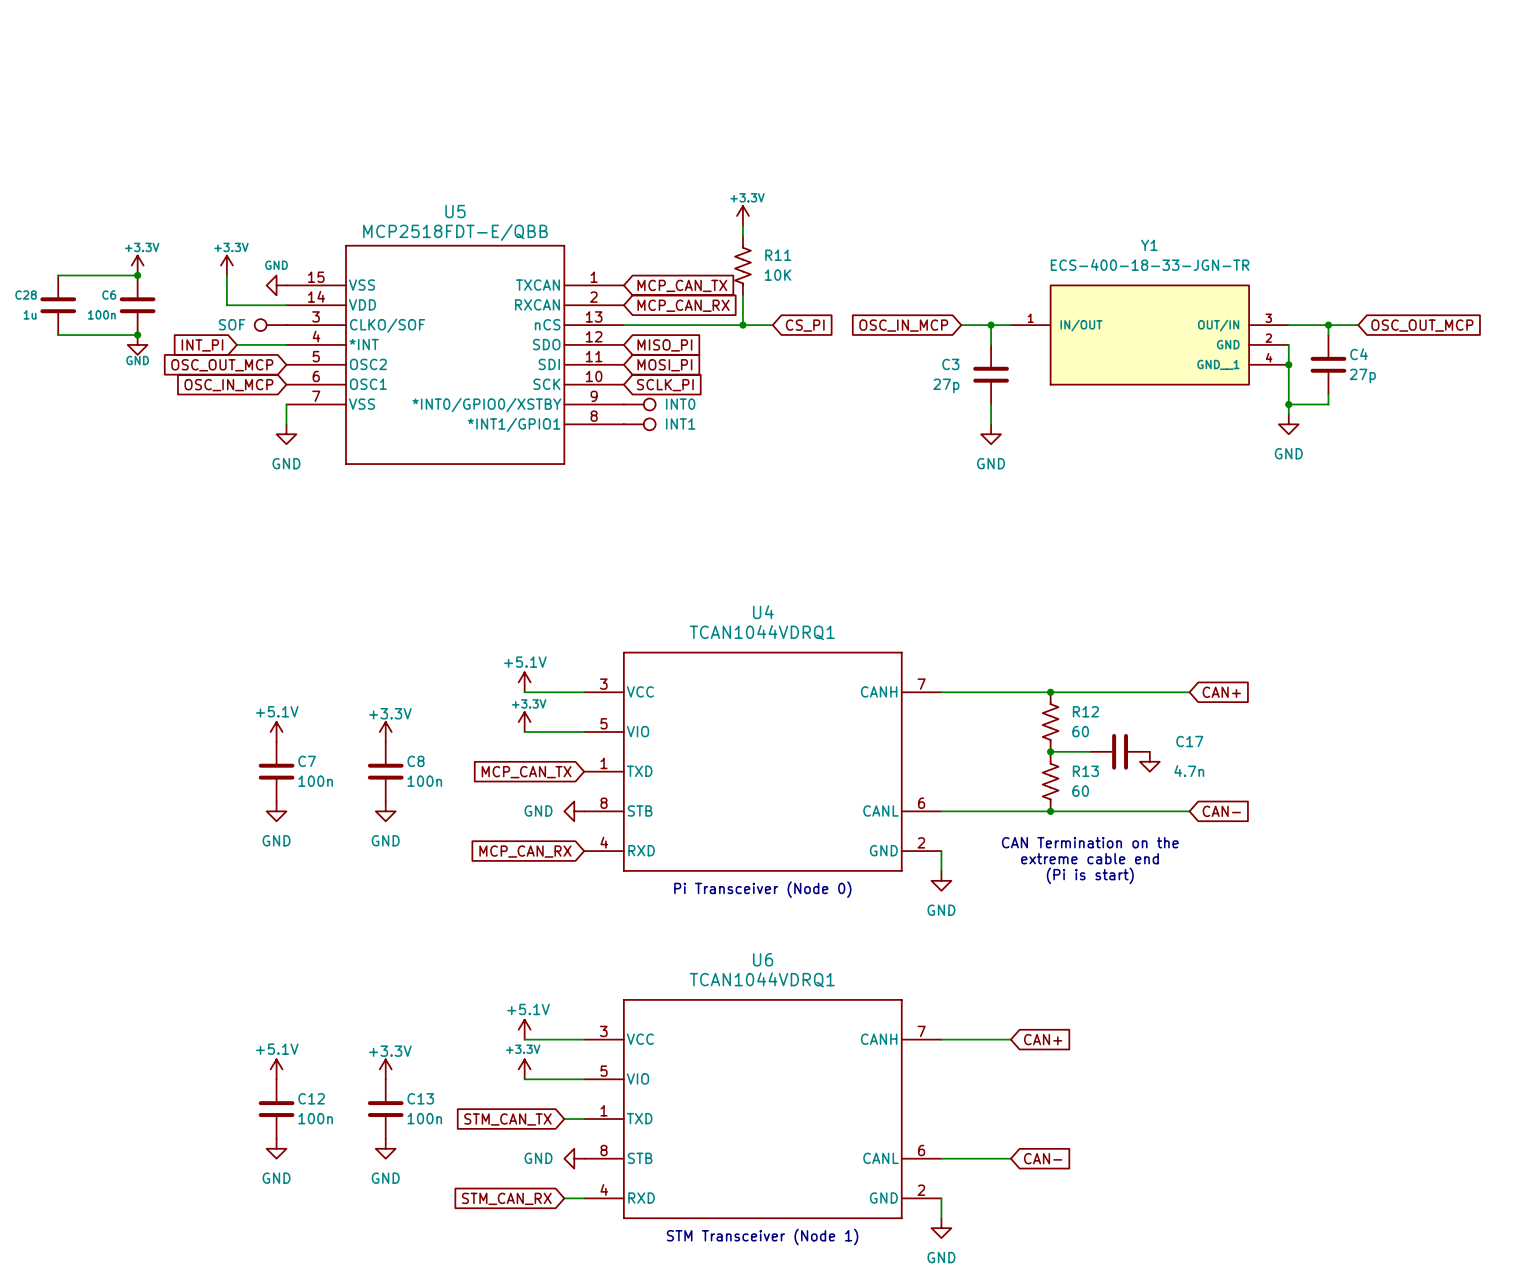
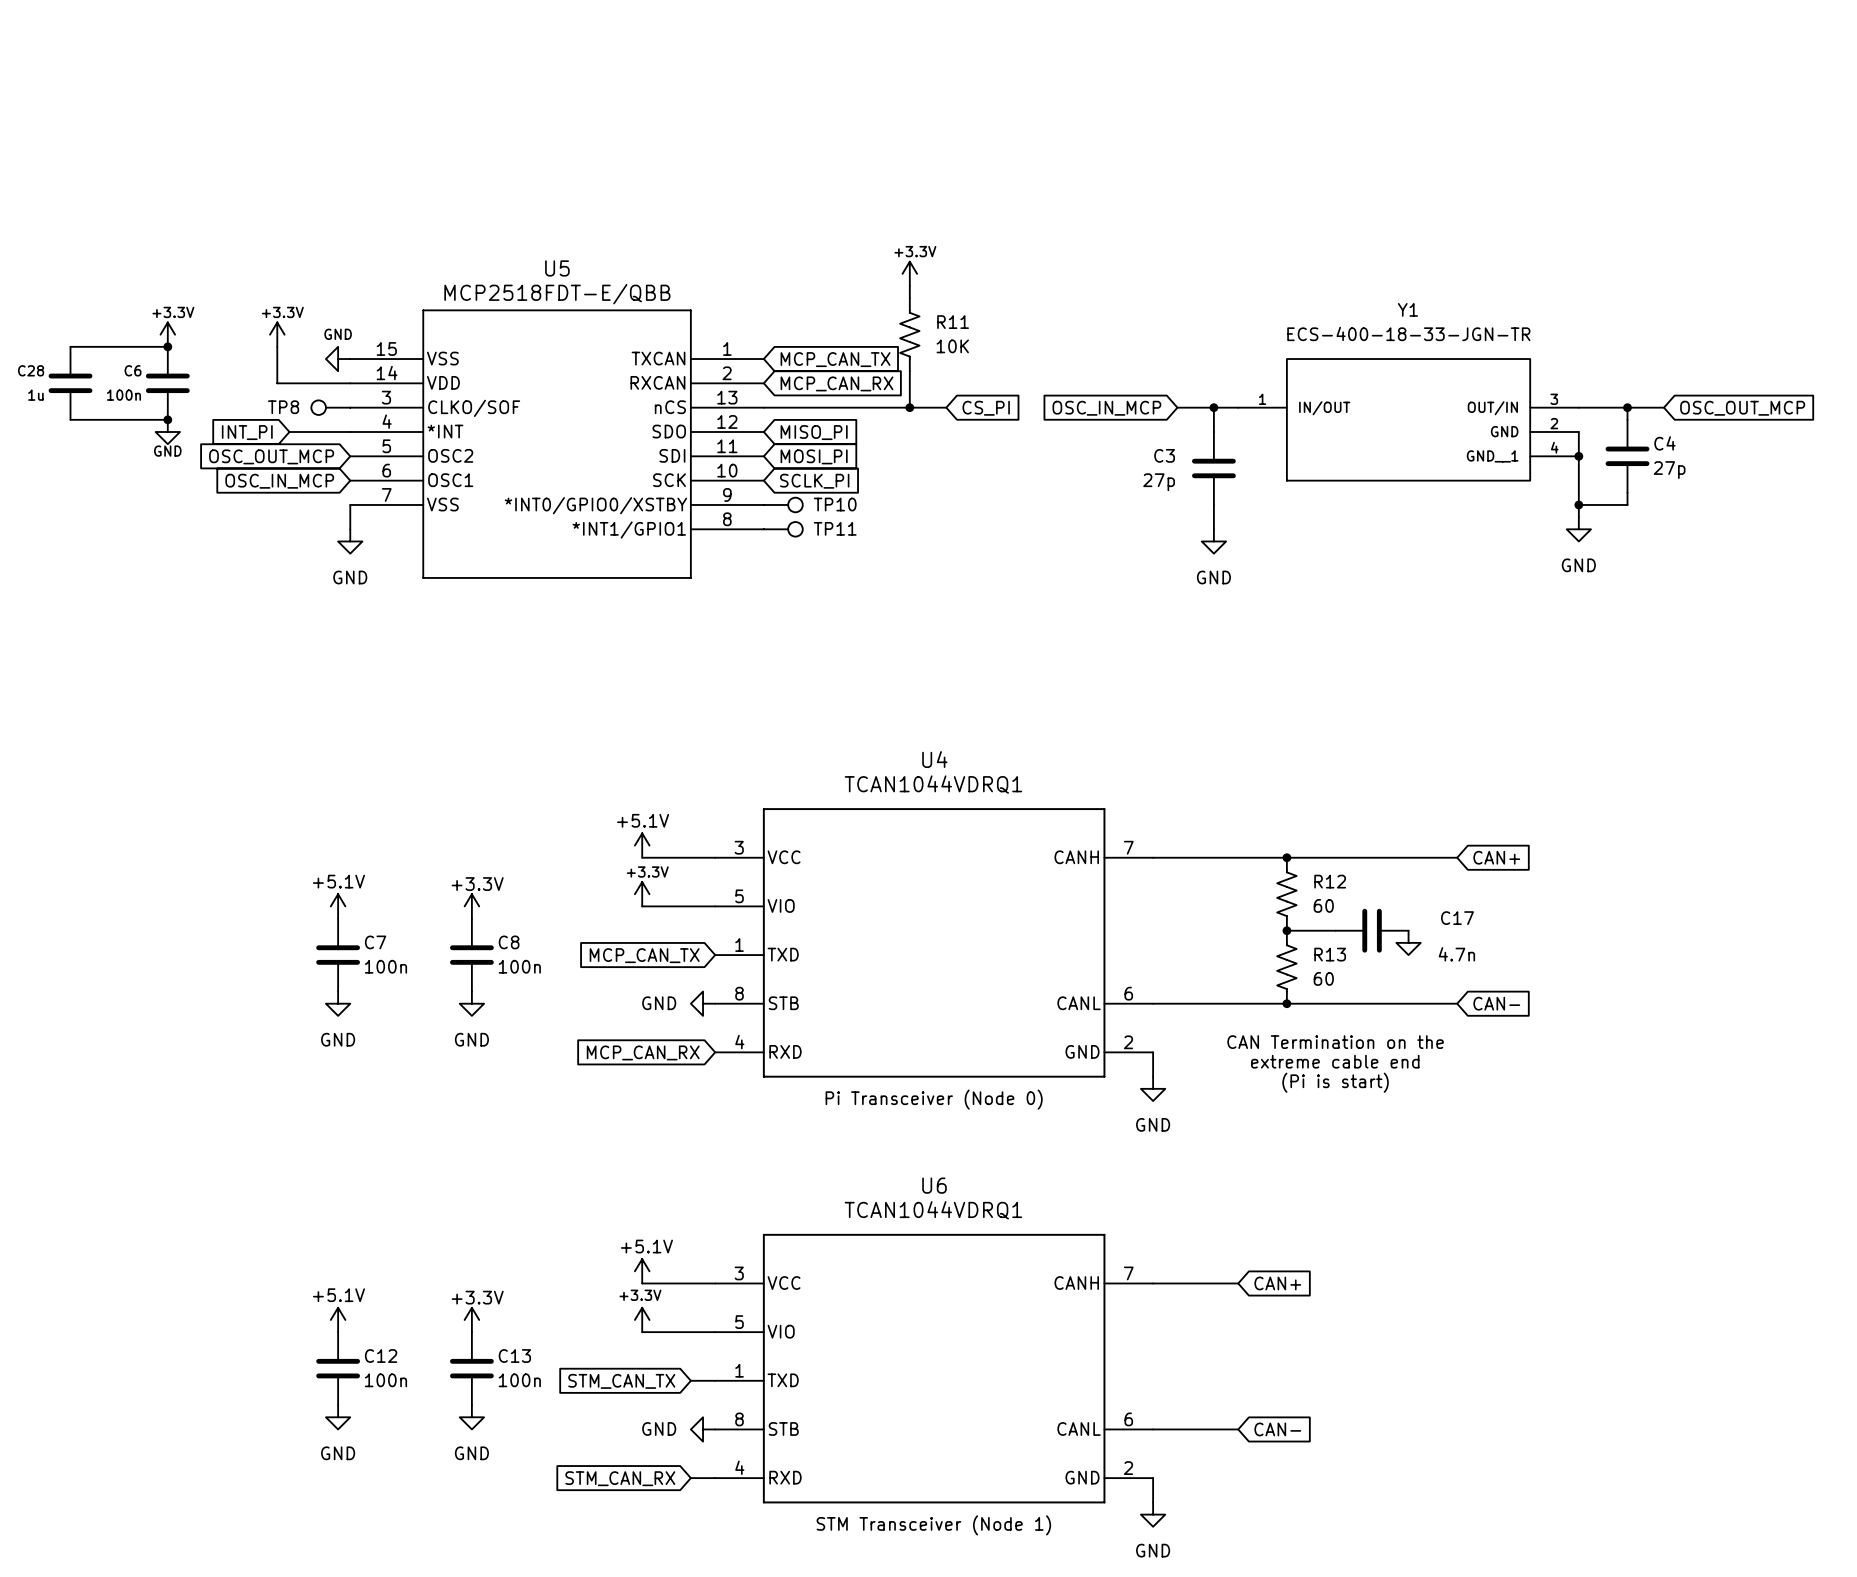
SOF name: SOF (232, 324) -> TP8 (283, 407)
INT0 name: INT0 (680, 404) -> TP10 (835, 504)
INT1 name: INT1 (680, 423) -> TP11 (835, 528)

